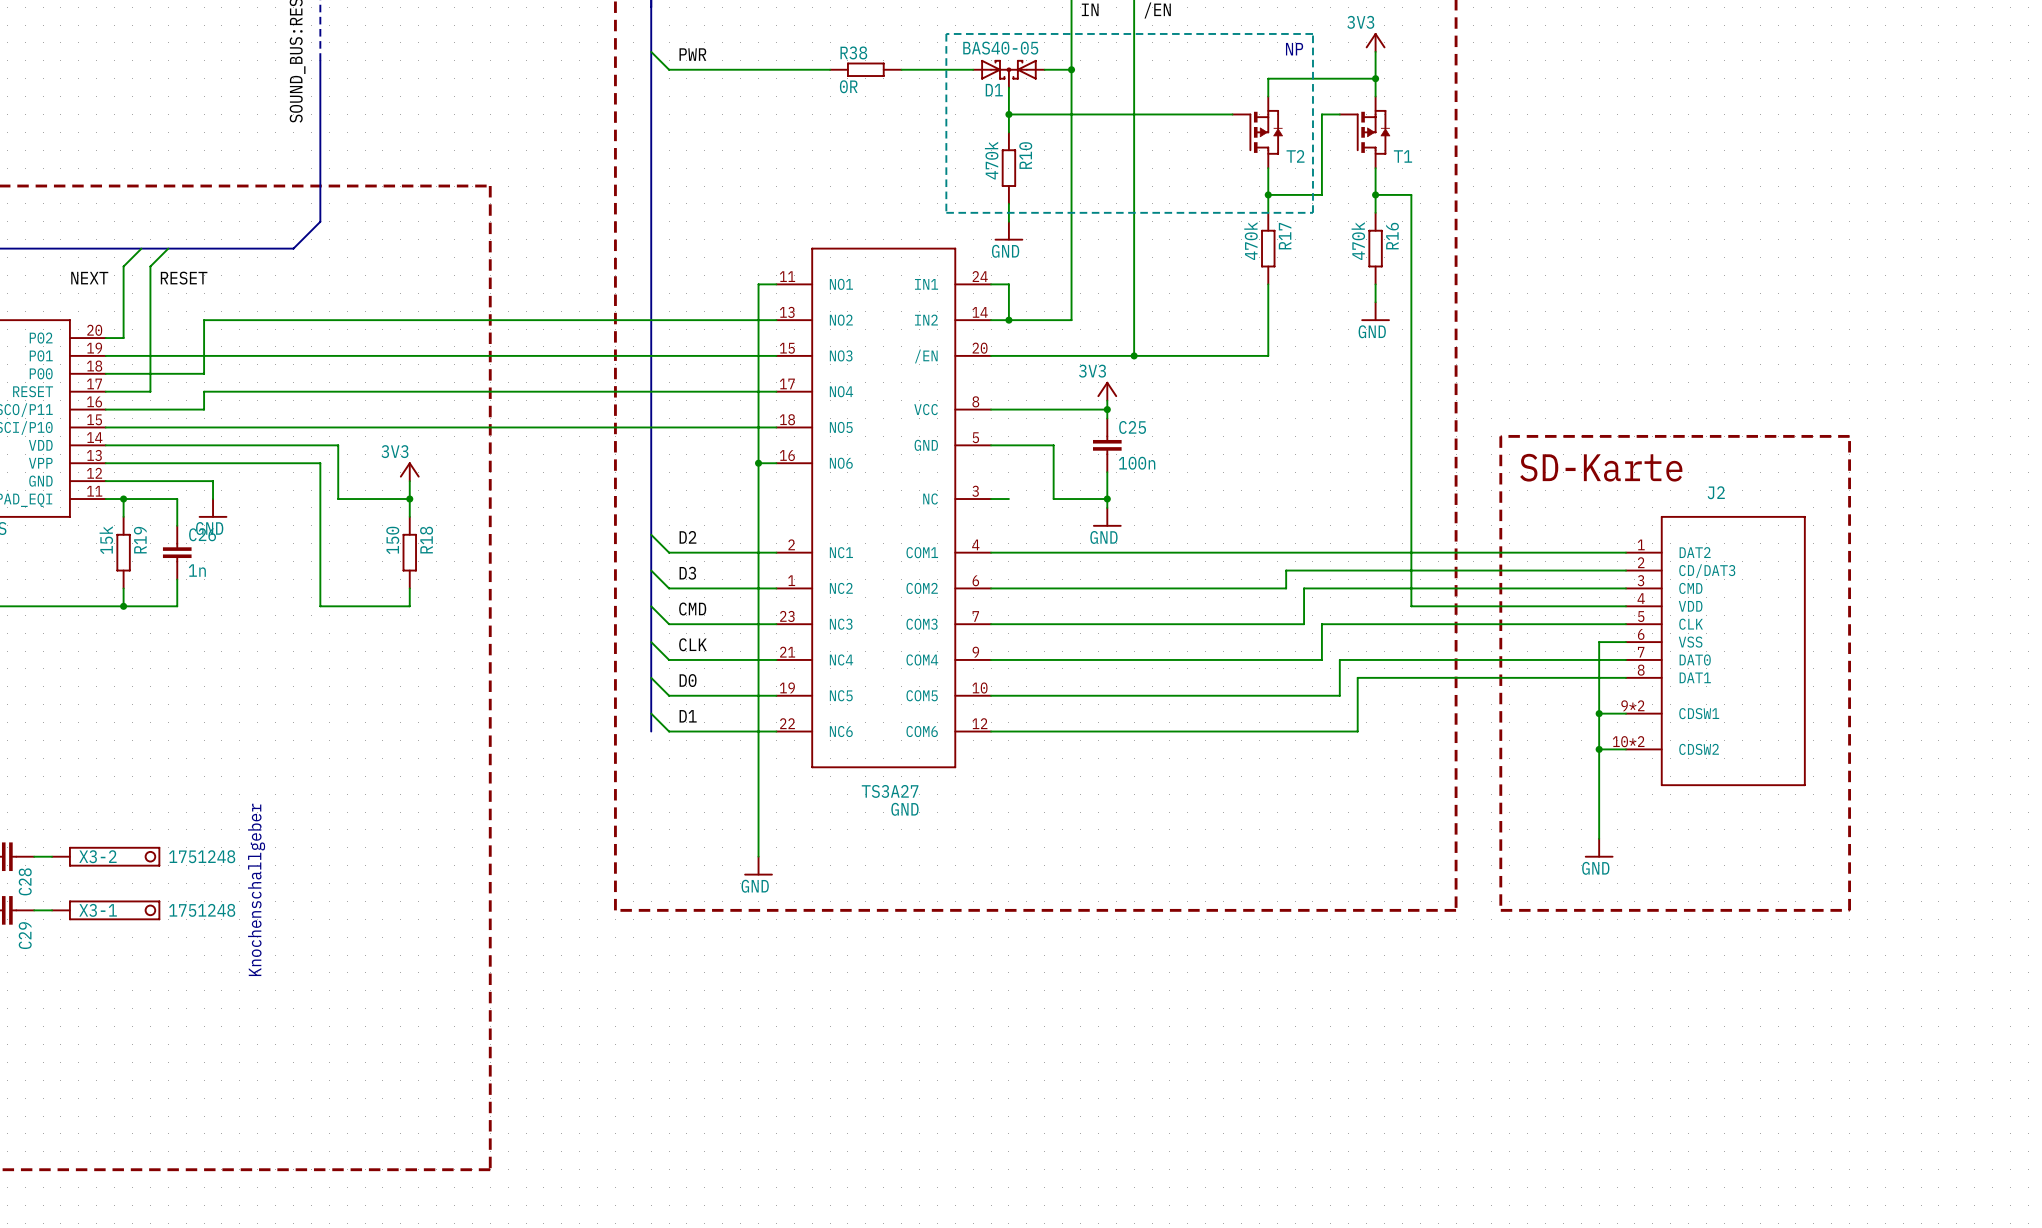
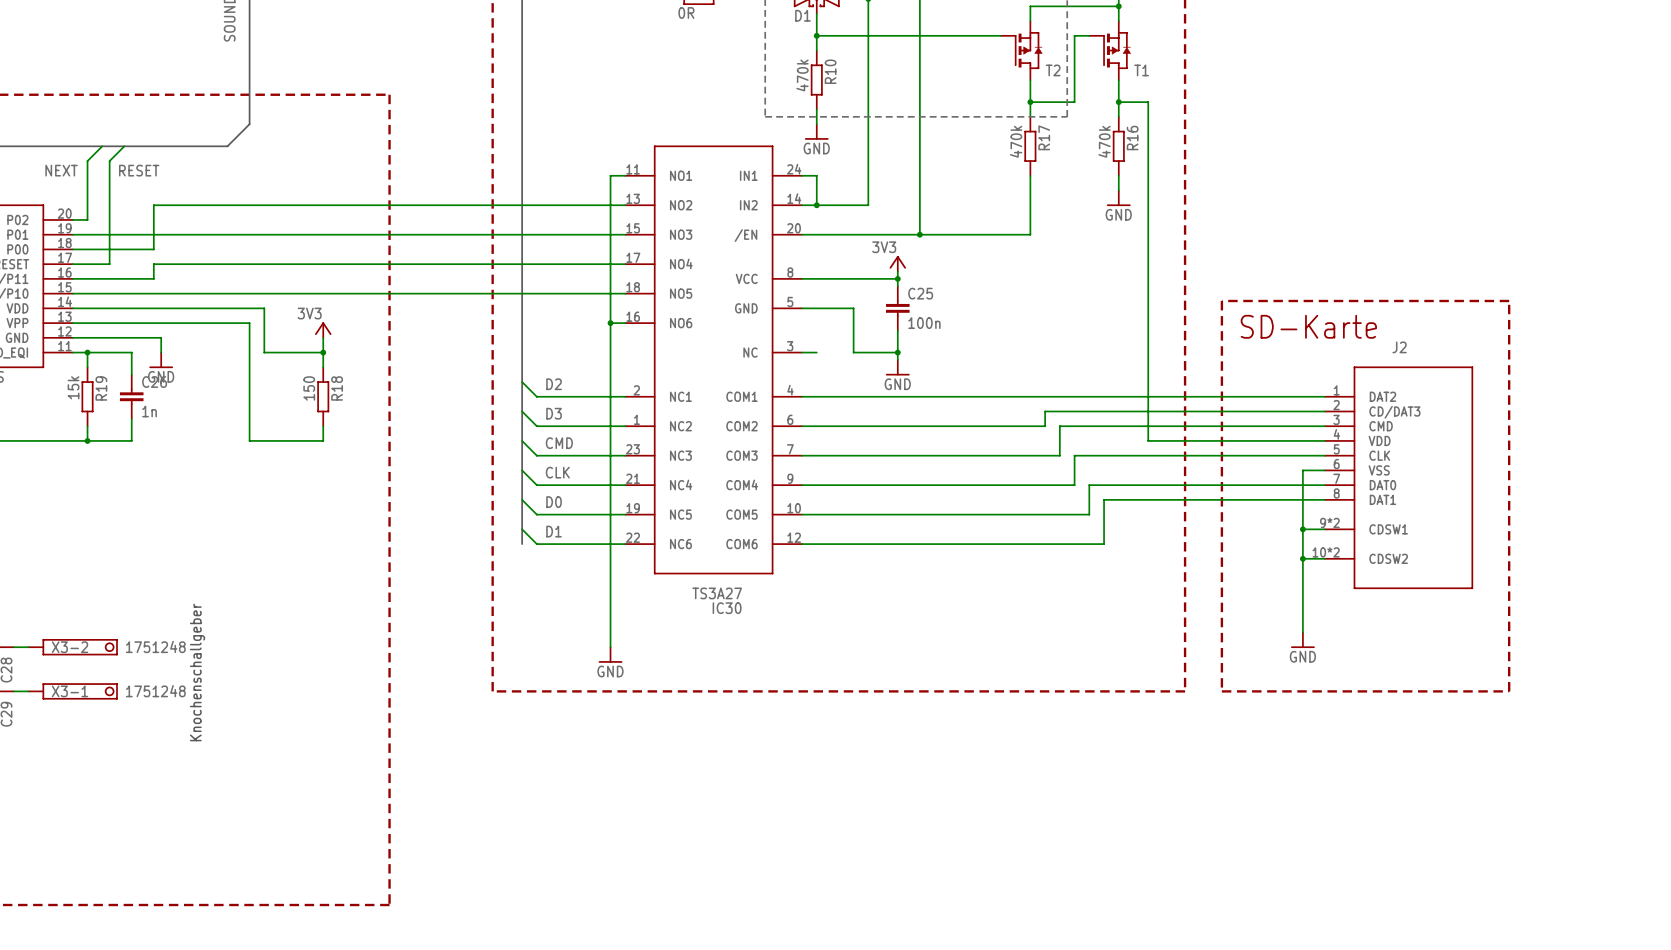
GND name: GND (904, 809) -> IC30 (727, 608)

